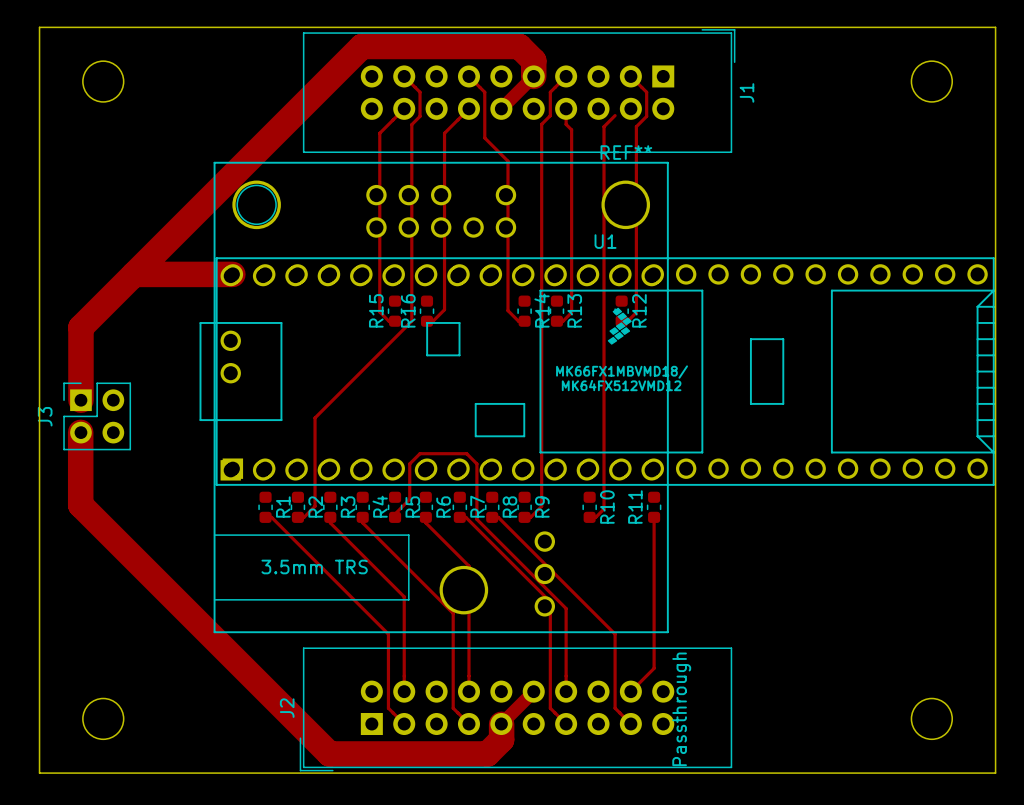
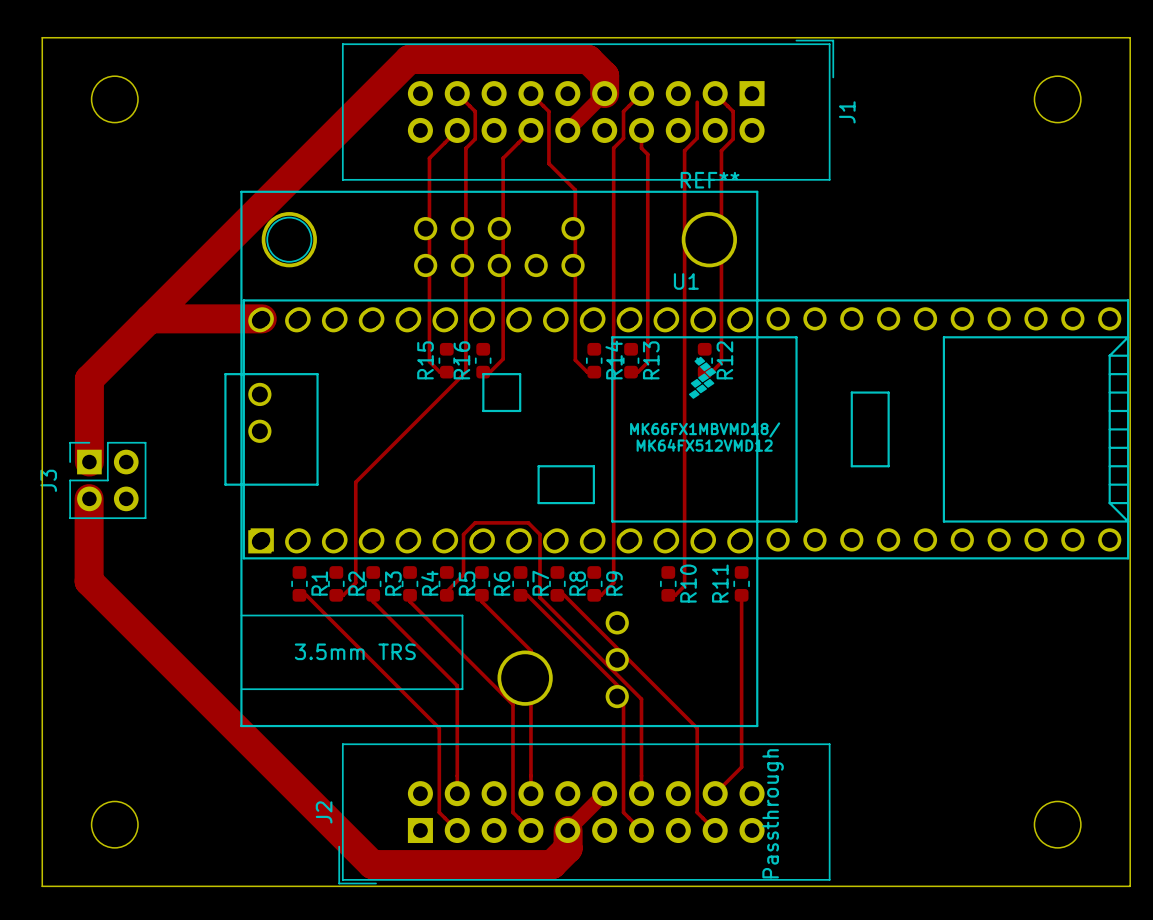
top track: none -> (697, 102) (697, 138)

